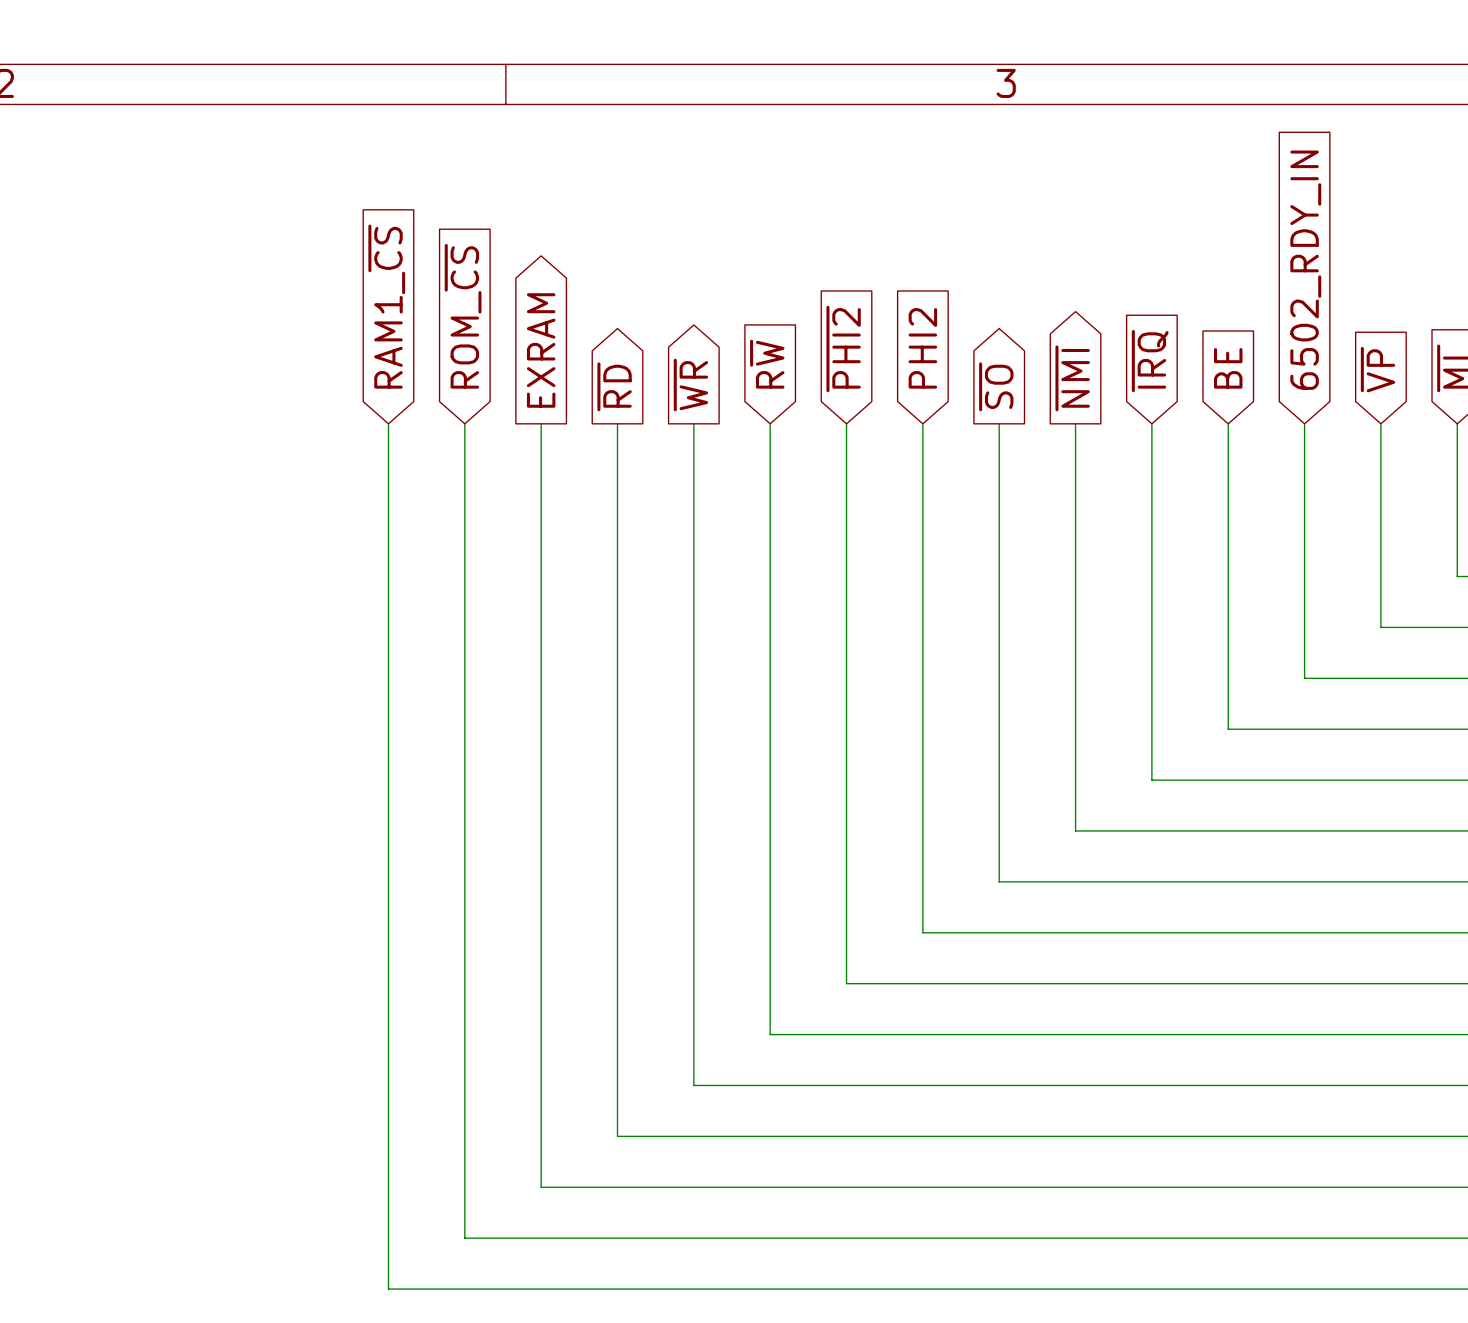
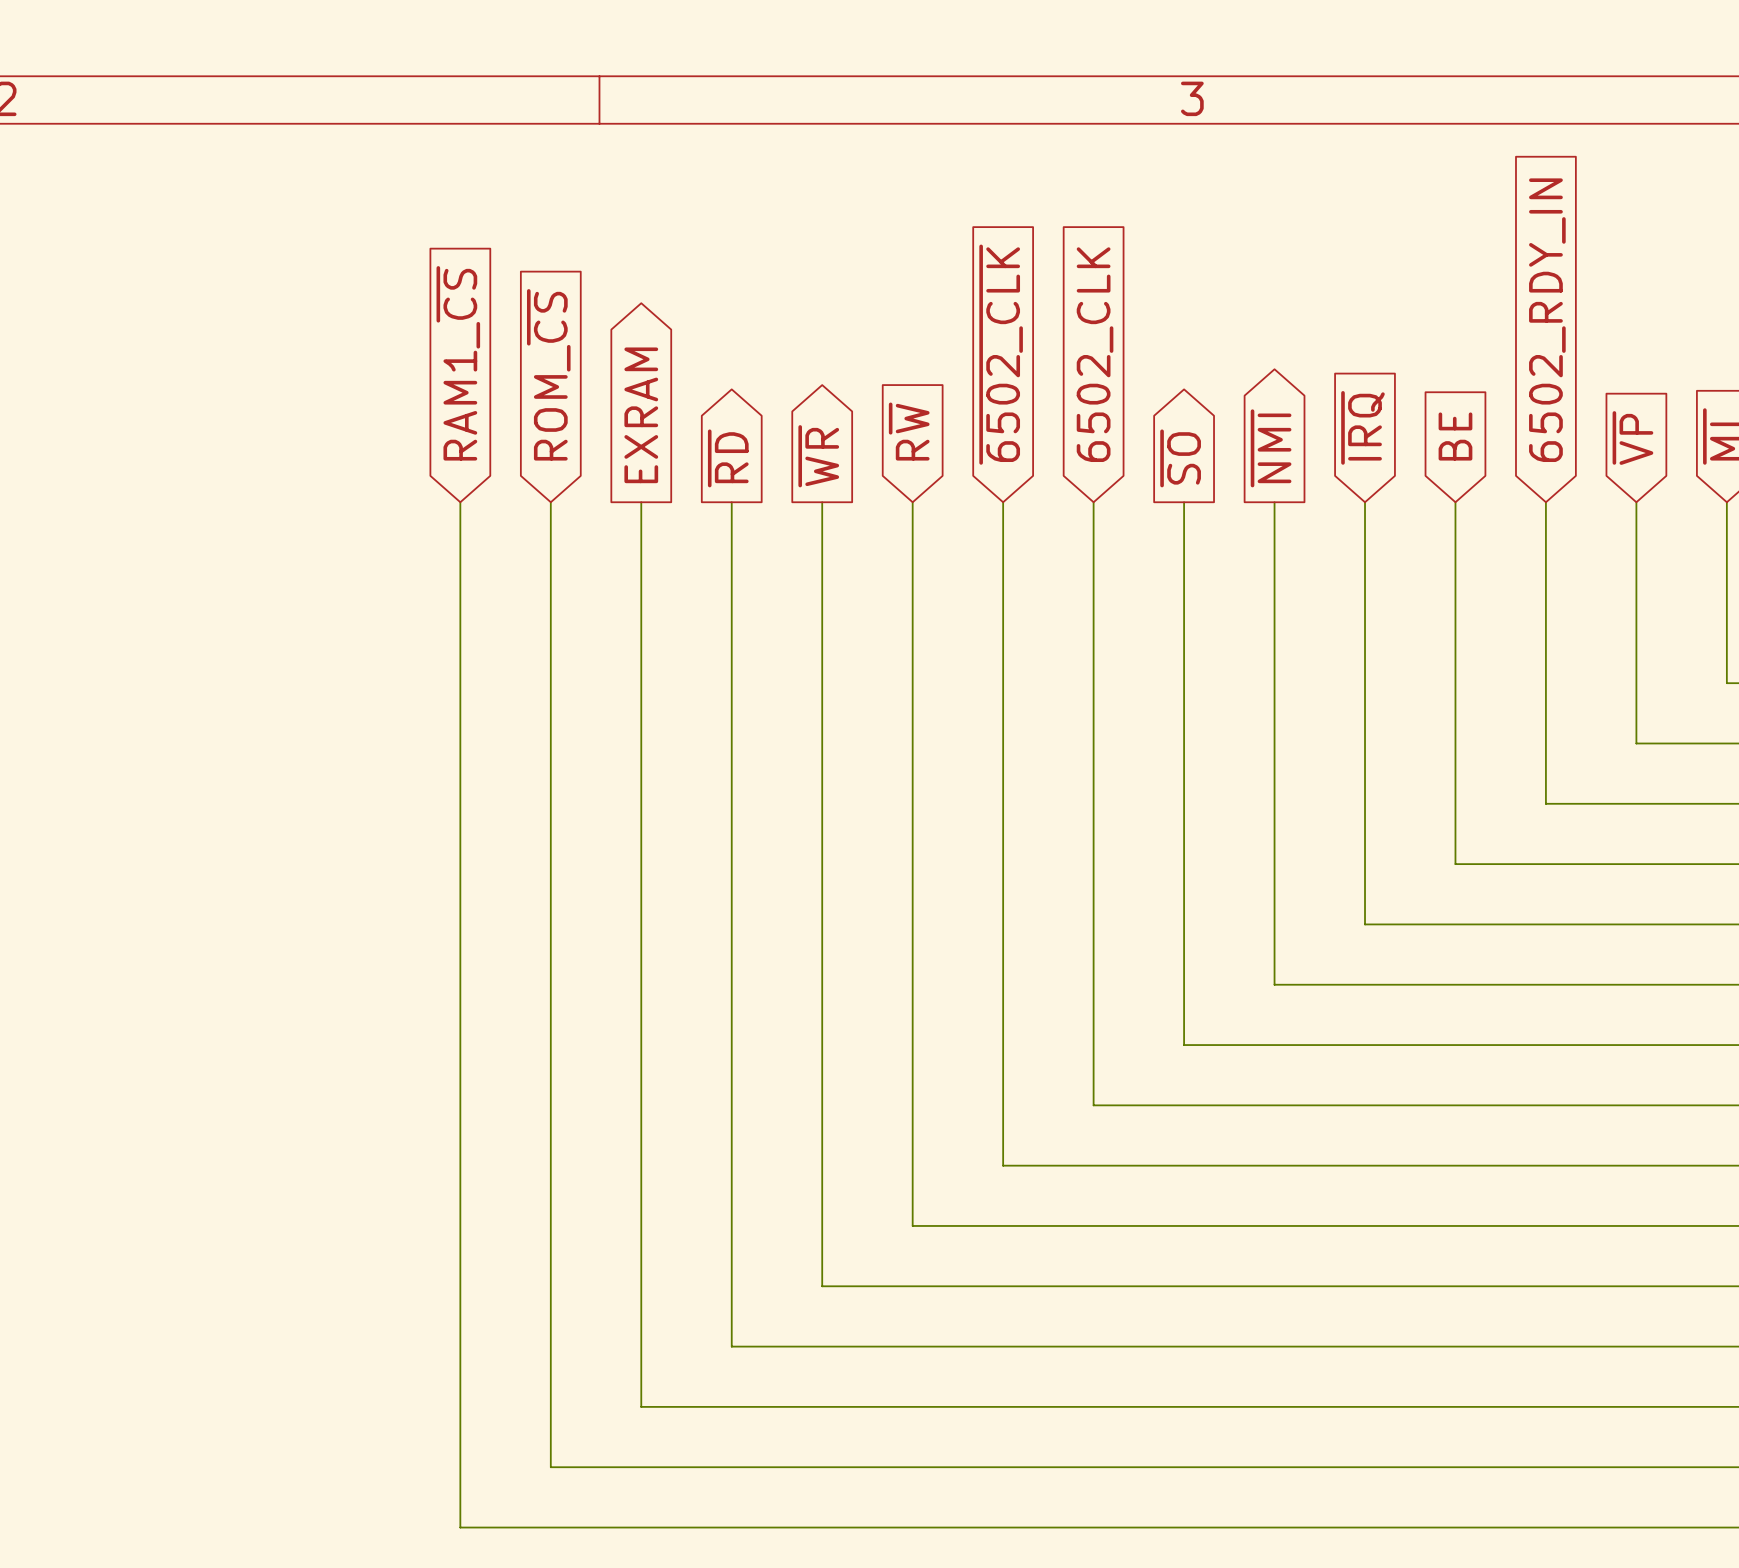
global label: ~{PHI2} (843, 348) -> ~{6502_CLK} (1001, 354)
global label: PHI2 (922, 348) -> 6502_CLK (1095, 354)

